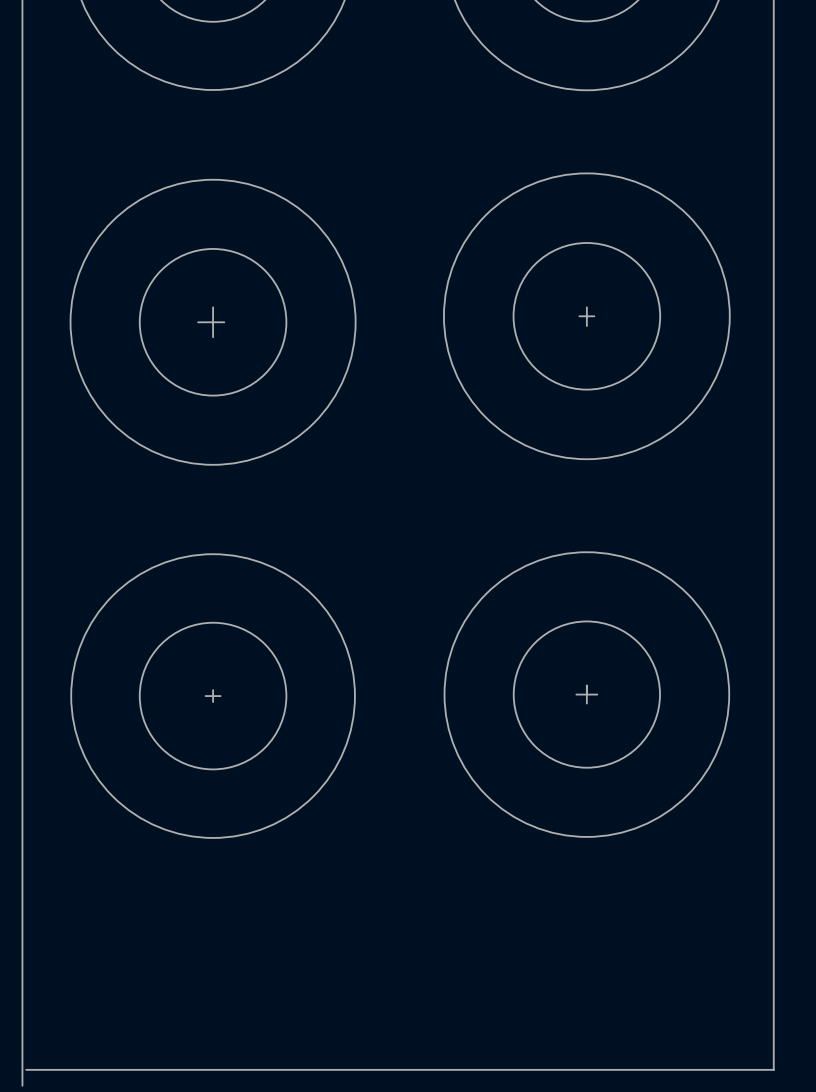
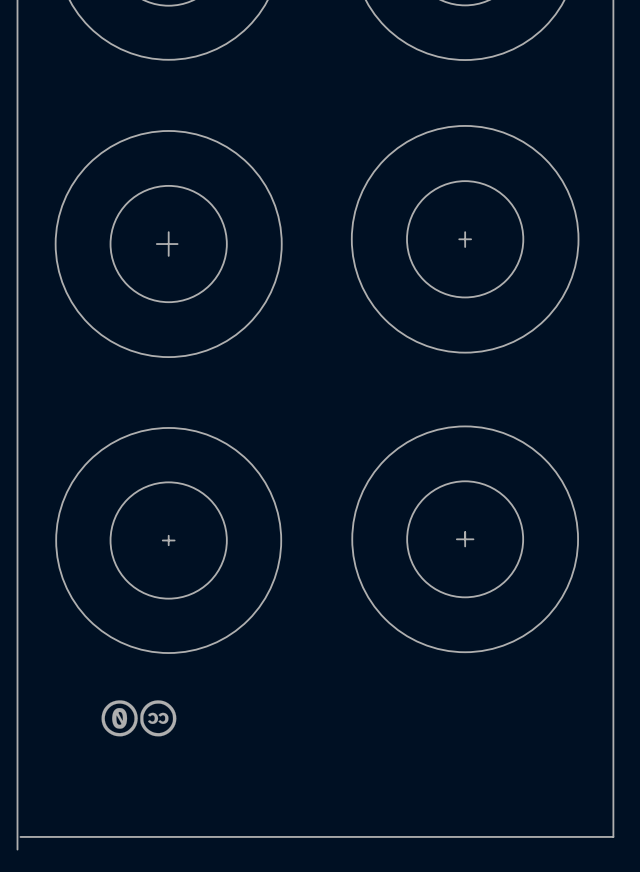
drawing: none -> [101, 700, 177, 737]

